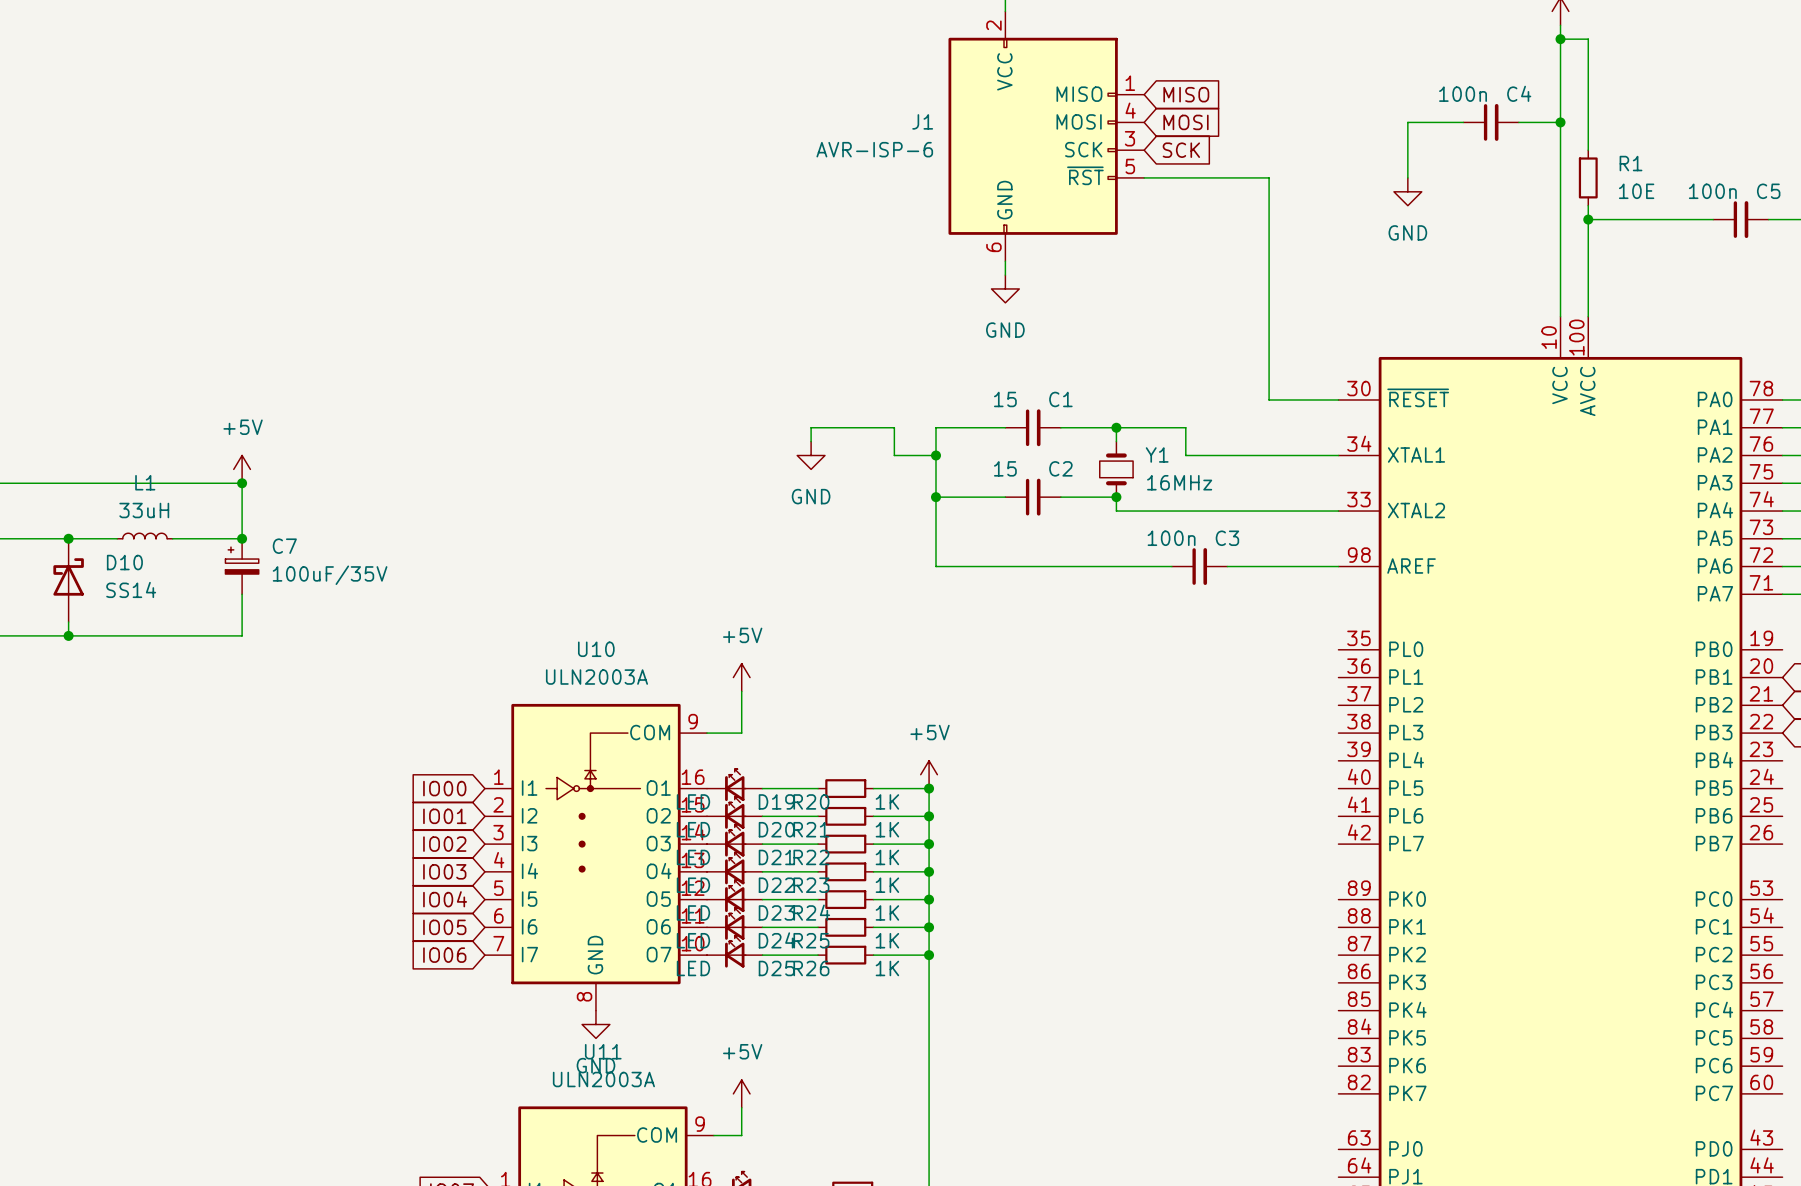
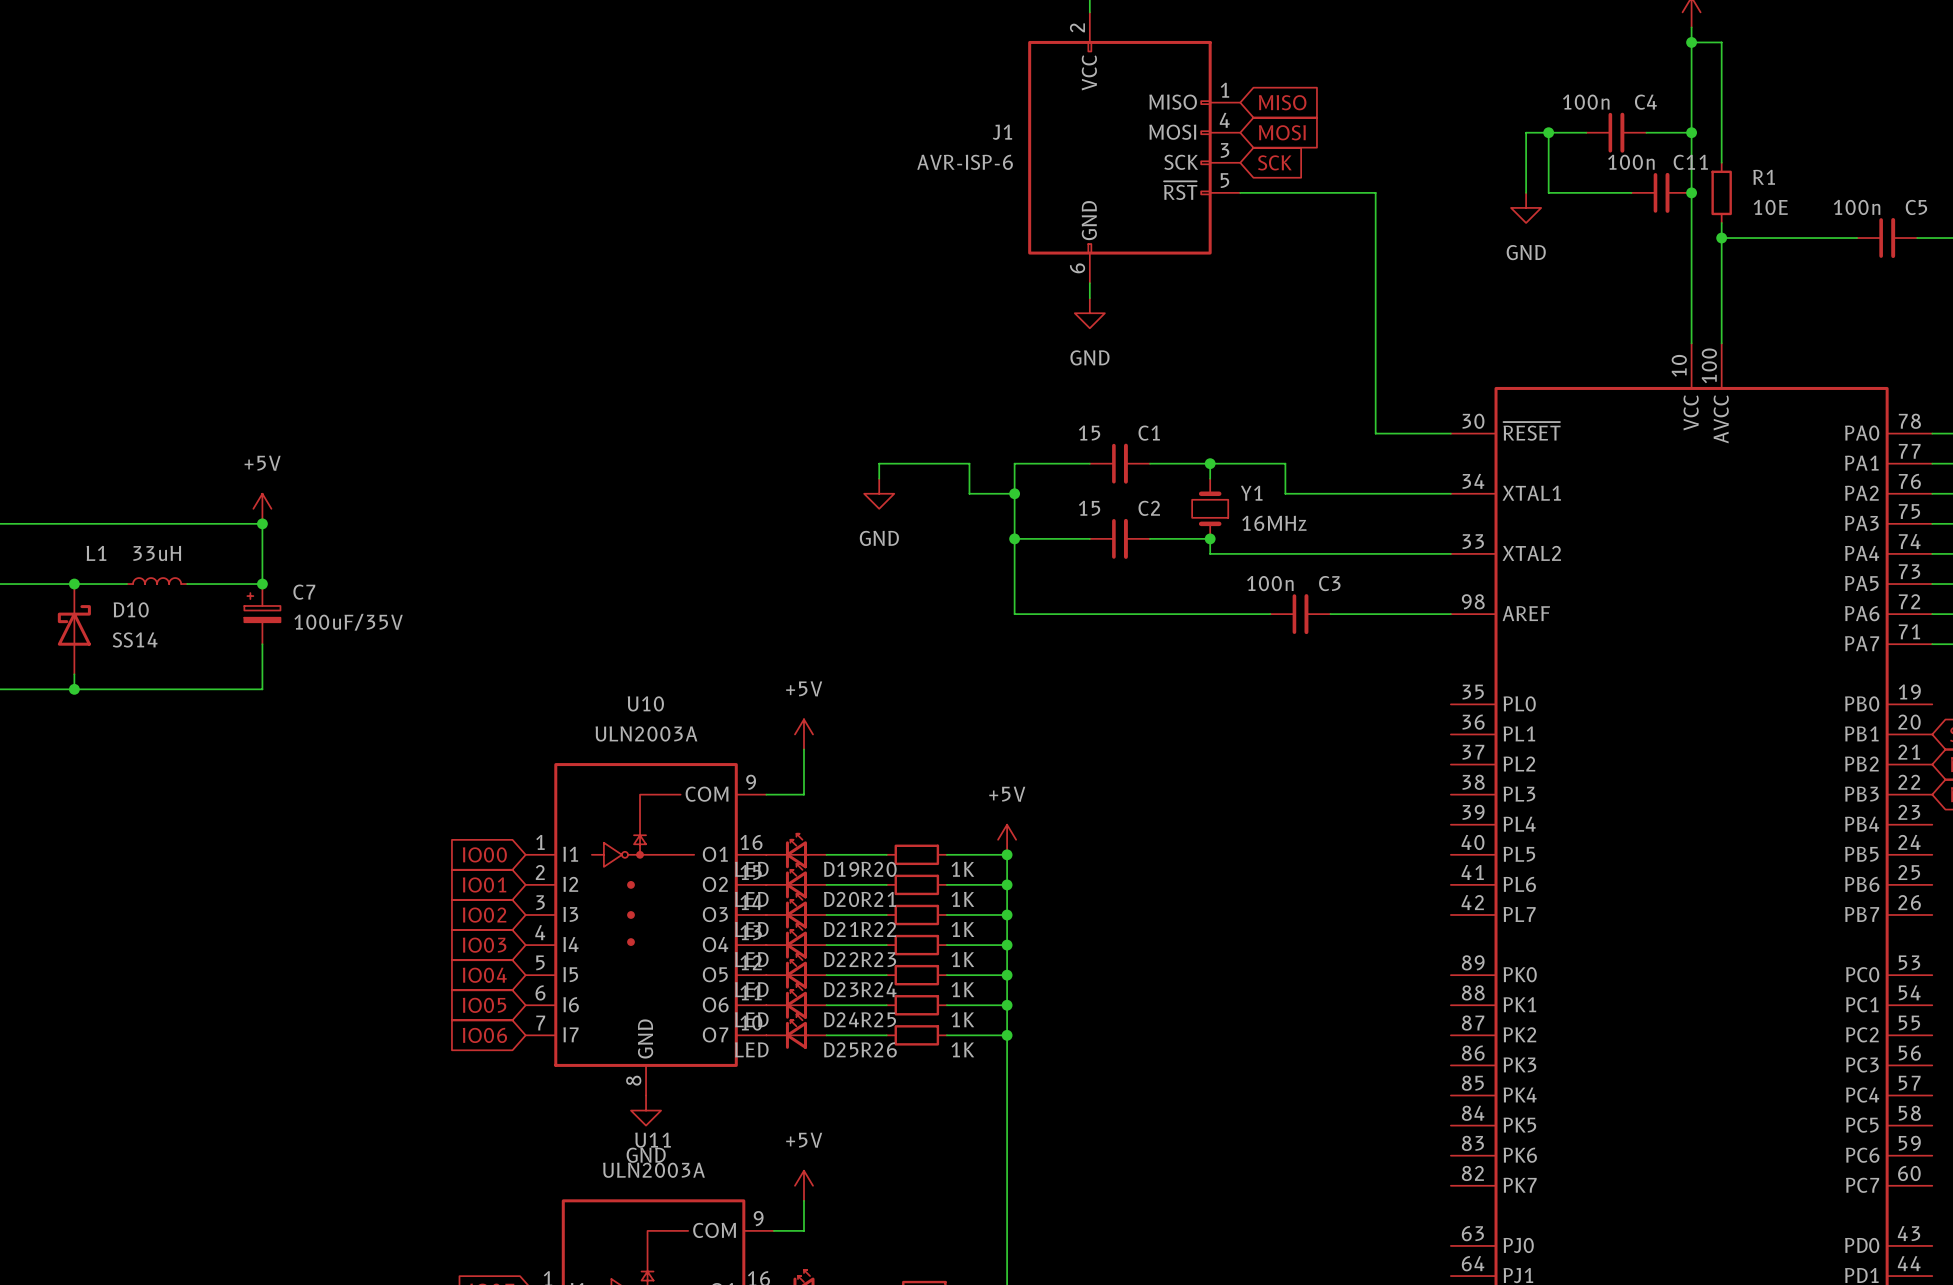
wire: none -> (1548, 132) (1548, 192) (1631, 192)
junction: none -> (1548, 132)
C11: none -> 100n (1661, 192)
junction: none -> (1691, 192)
L1 name position: L1 (145, 482) -> L1 (96, 553)

